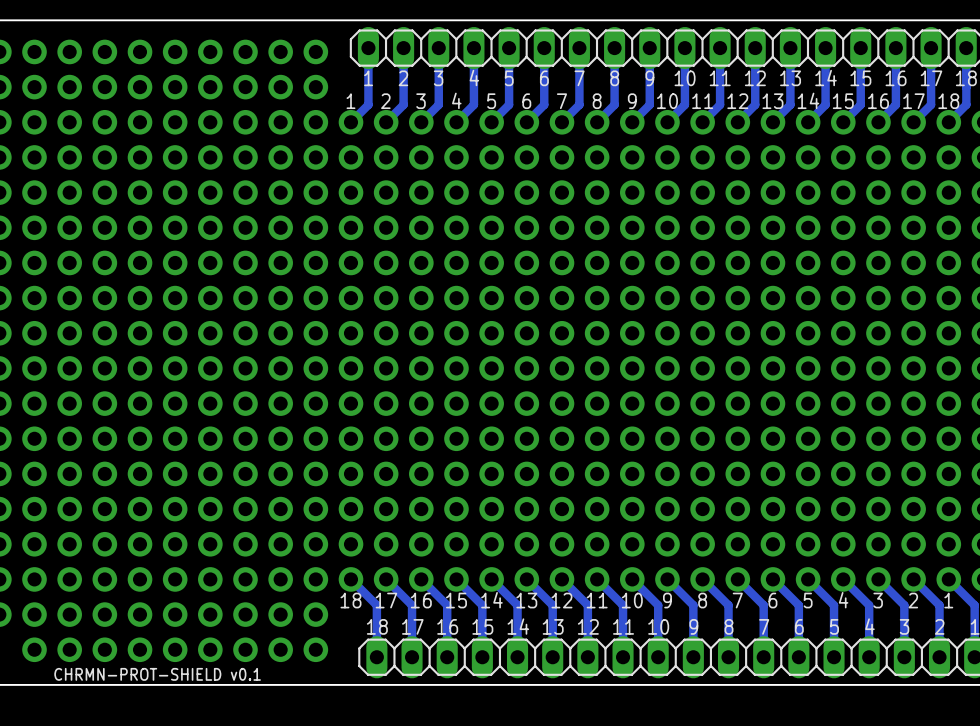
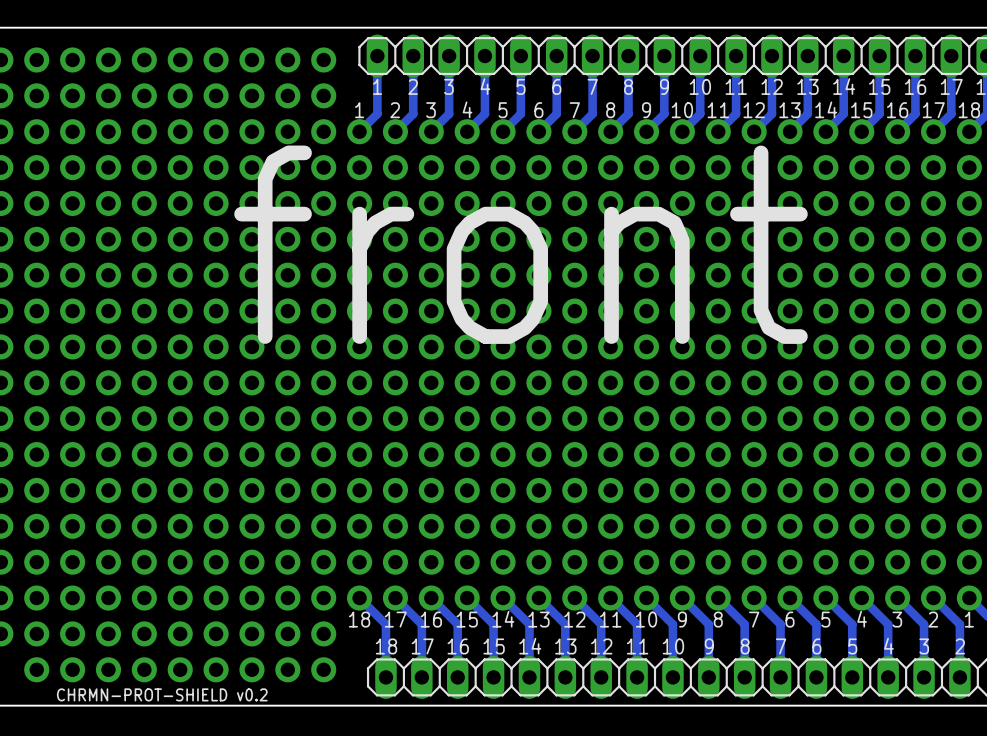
text: none -> front (520, 244)
text: CHRMN-PROT-SHIELD v0.1 (157, 674) -> CHRMN-PROT-SHIELD v0.2 (162, 694)

